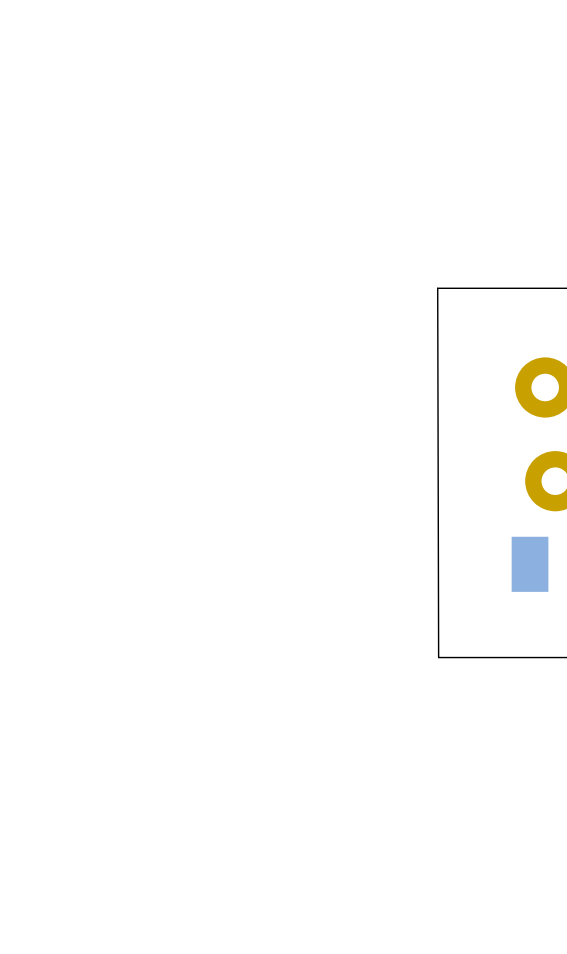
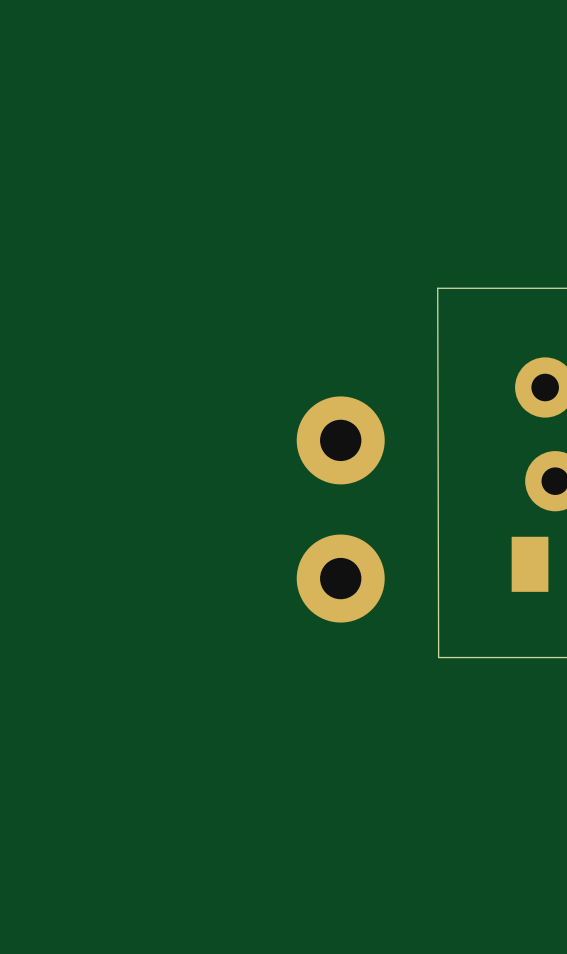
part: none -> (340, 440)
part: none -> (340, 578)

